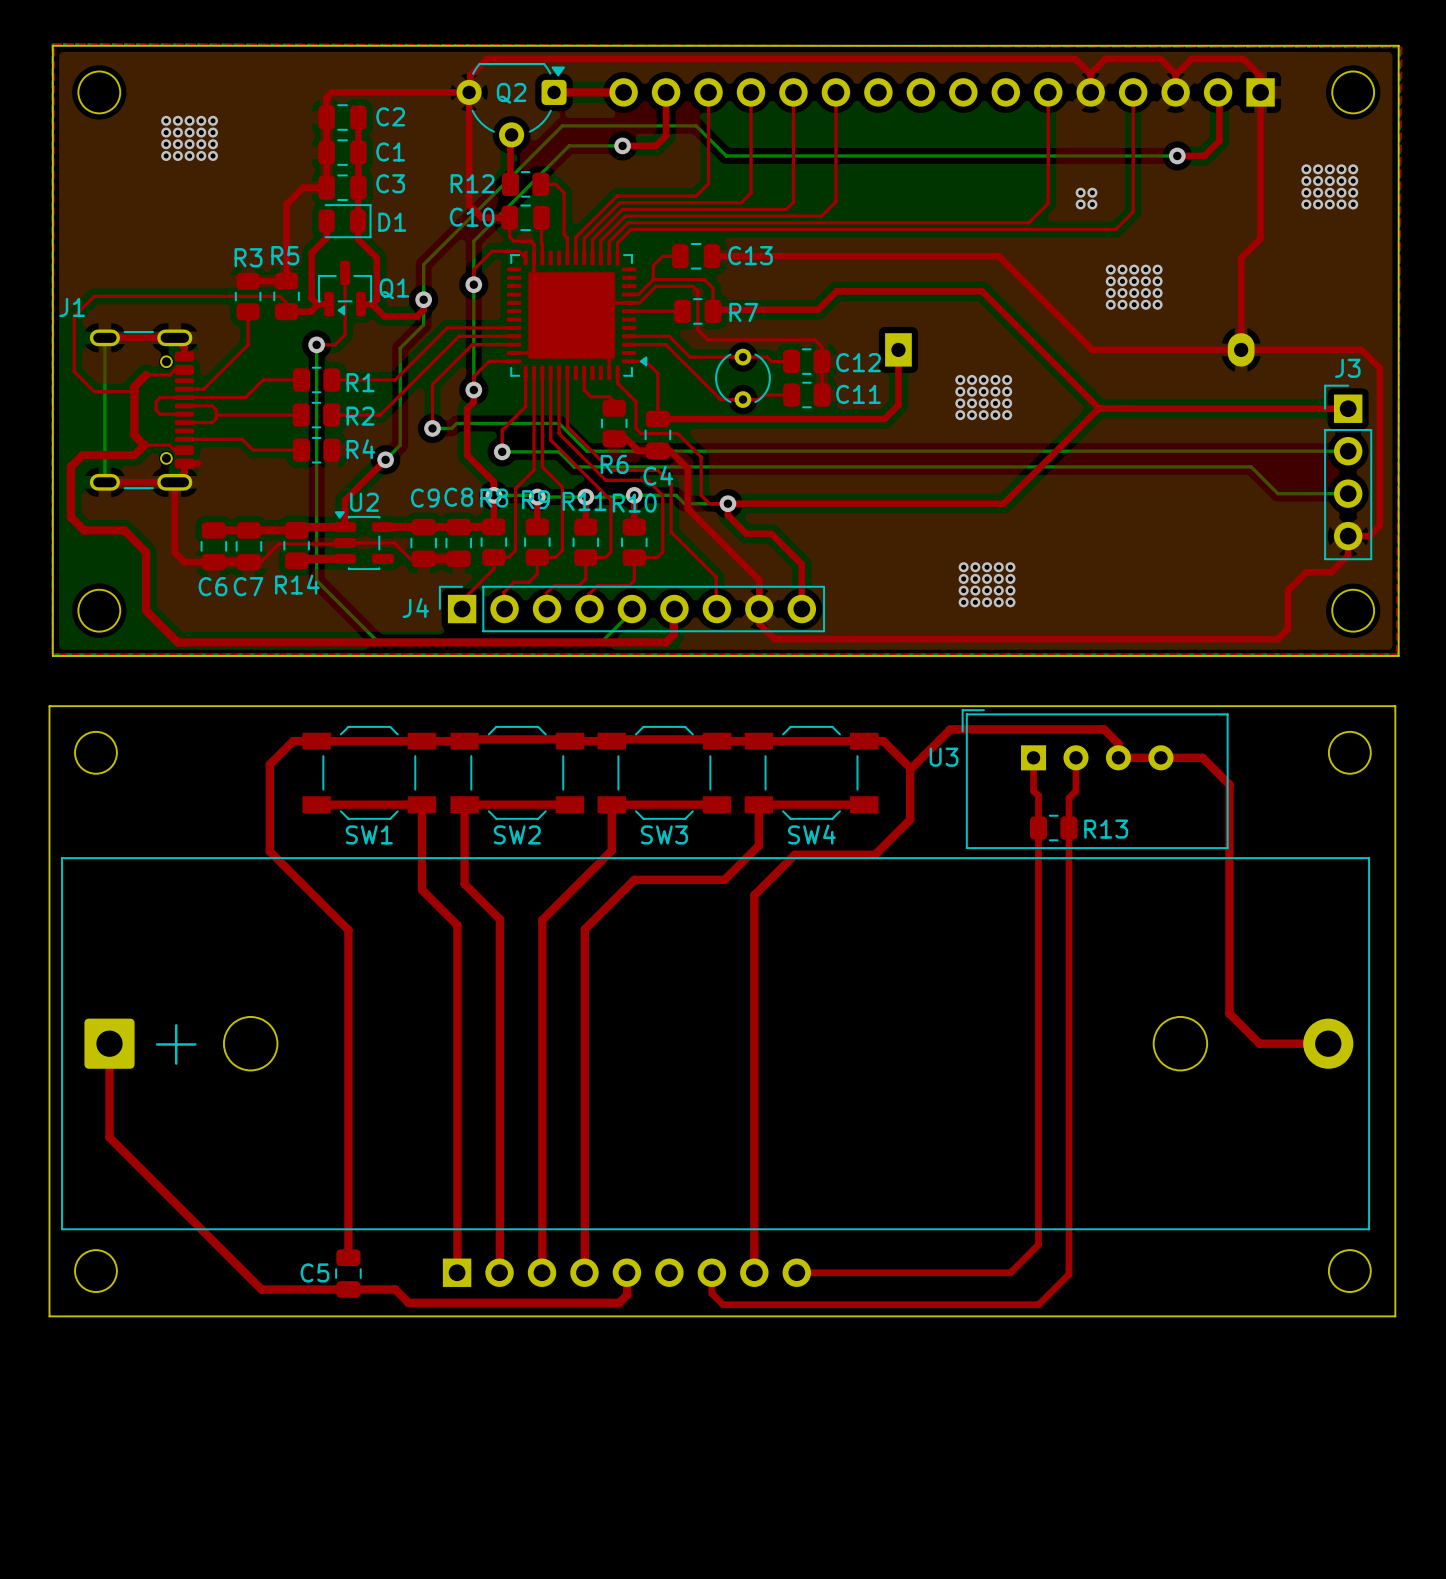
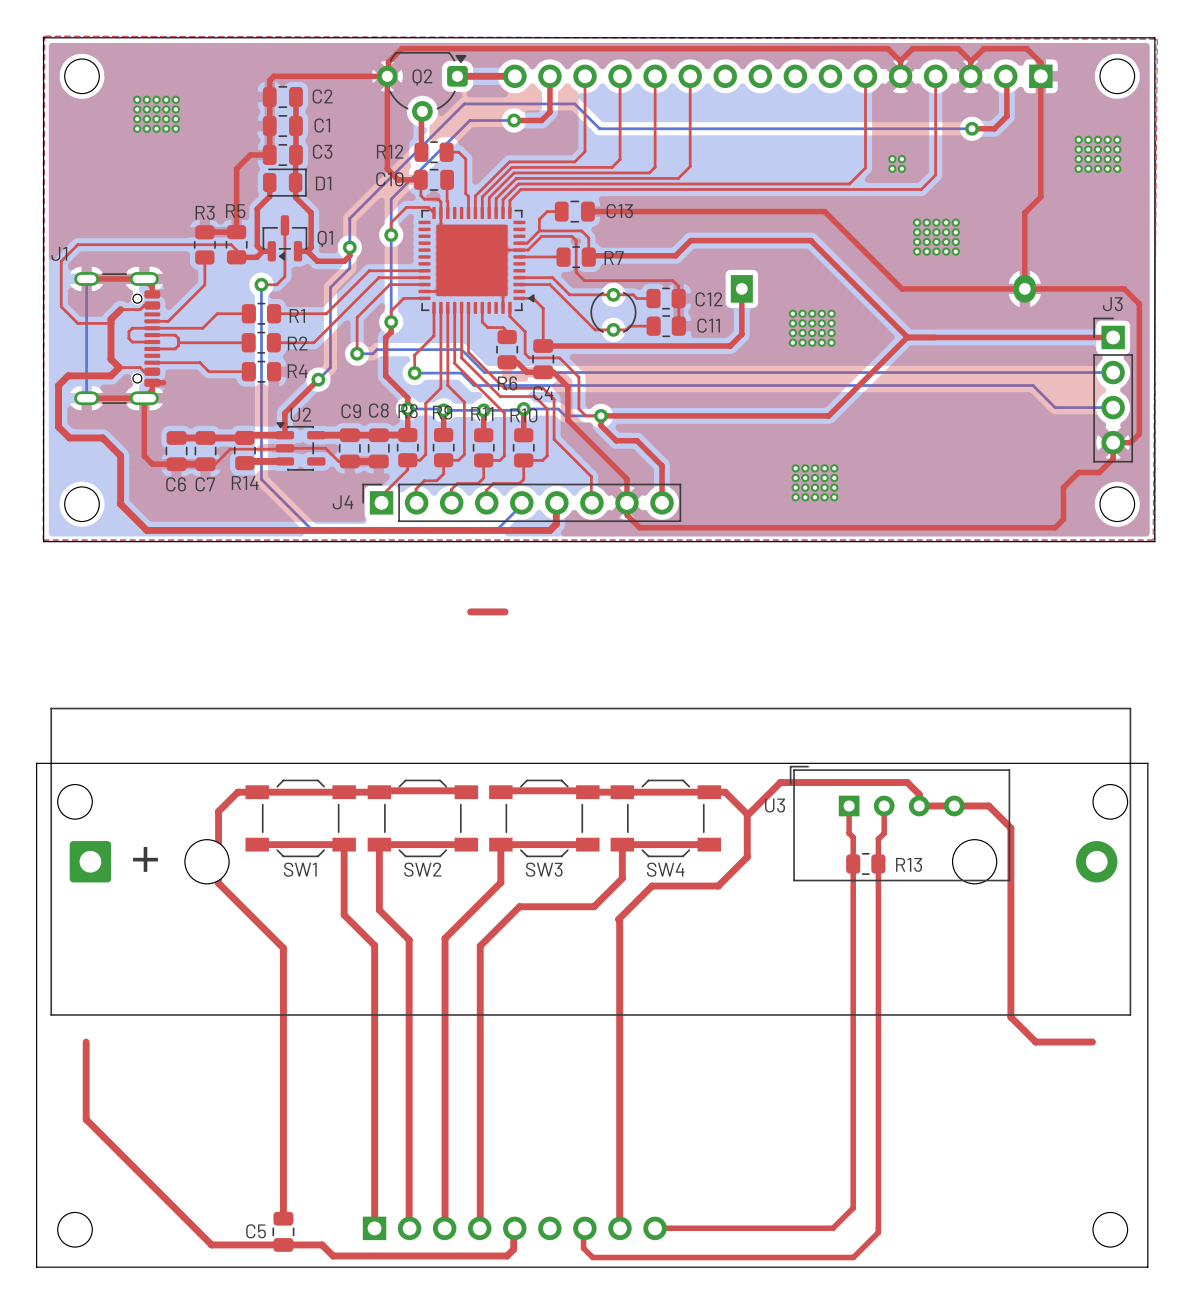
board edge: (49, 706) (1395, 706) (1395, 1316) (49, 1316) (49, 706) -> (36, 763) (1147, 763) (1147, 1267) (36, 1267) (36, 763)
round board edge: [74, 731, 118, 775] -> none
round board edge: [1328, 731, 1372, 775] -> none
top track: (470, 739) (575, 739) -> (384, 790) (471, 790)
top track: (614, 739) (719, 739) -> (503, 790) (590, 790)
top track: (464, 741) (293, 741) (269, 764) (269, 851) (348, 930) (348, 1256) (346, 1257) -> (379, 792) (237, 792) (218, 811) (218, 883) (283, 948) (282, 1218)
top track: (717, 741) (883, 741) (910, 767) -> (587, 792) (725, 792) (747, 814)
top track: (1033, 757) (1033, 790) (1038, 795) (1038, 1244) (1010, 1272) (796, 1272) -> none
top track: (1076, 757) (1076, 790) (1068, 797) (1068, 1274) (1038, 1304) (723, 1304) (711, 1293) (711, 1272) -> (884, 805) (884, 833) (878, 839) (878, 1232) (853, 1257) (592, 1257) (583, 1248) (583, 1231)
top track: (910, 767) (950, 729) (1104, 729) (1118, 743) (1118, 757) (1202, 757) (1229, 784) (1229, 1013) (1259, 1043) (1328, 1043) -> (747, 814) (780, 782) (907, 782) (919, 794) (919, 805) (988, 805) (1010, 828) (1010, 1017) (1035, 1042) (1092, 1042)
top track: (910, 767) (910, 819) (875, 854) (794, 854) (754, 895) (754, 1272) -> none
SW1 position: (369, 772) -> (300, 818)
SW2 position: (517, 772) -> (422, 818)
SW3 position: (664, 772) -> (544, 818)
SW4 position: (811, 772) -> (665, 818)
U3 position: (1095, 779) -> (899, 823)
top track: (316, 804) (421, 804) (421, 889) (457, 925) (457, 1272) -> none
top track: (569, 804) (464, 804) (464, 884) (499, 919) (499, 1272) -> none
top track: (717, 804) (611, 804) (611, 850) (542, 919) (542, 1272) -> none
top track: (864, 804) (758, 804) (758, 845) (724, 879) (634, 879) (584, 929) (584, 1272) -> none
R13 position: (1053, 828) -> (865, 863)
round board edge: none -> [57, 784, 93, 820]
round board edge: none -> [1092, 784, 1128, 820]
top track: none -> (849, 805) (849, 833) (853, 837) (853, 1208) (832, 1228) (656, 1228) (653, 1231)
top track: none -> (747, 814) (747, 857) (718, 886) (652, 886) (618, 919) (618, 1231)
top track: none -> (257, 844) (344, 844) (344, 915) (374, 945) (373, 1231)
top track: none -> (466, 844) (379, 844) (379, 910) (409, 939) (408, 1231)
top track: none -> (587, 844) (500, 844) (500, 882) (445, 938) (443, 1231)
top track: none -> (709, 844) (622, 844) (622, 878) (594, 906) (519, 906) (480, 946) (480, 1229) (478, 1231)
top track: (109, 1043) (109, 1137) (261, 1289) (395, 1289) (408, 1302) (619, 1302) (627, 1294) (627, 1272) -> (86, 1042) (86, 1119) (211, 1244) (322, 1244) (333, 1255) (507, 1255) (513, 1249) (513, 1231)
round board edge: [74, 1249, 118, 1293] -> none
round board edge: [1328, 1249, 1372, 1293] -> none
part position: (626, 1272) -> (514, 1228)
C5 position: (348, 1273) -> (283, 1231)
round board edge: none -> [57, 1212, 93, 1248]
round board edge: none -> [1092, 1212, 1128, 1248]

